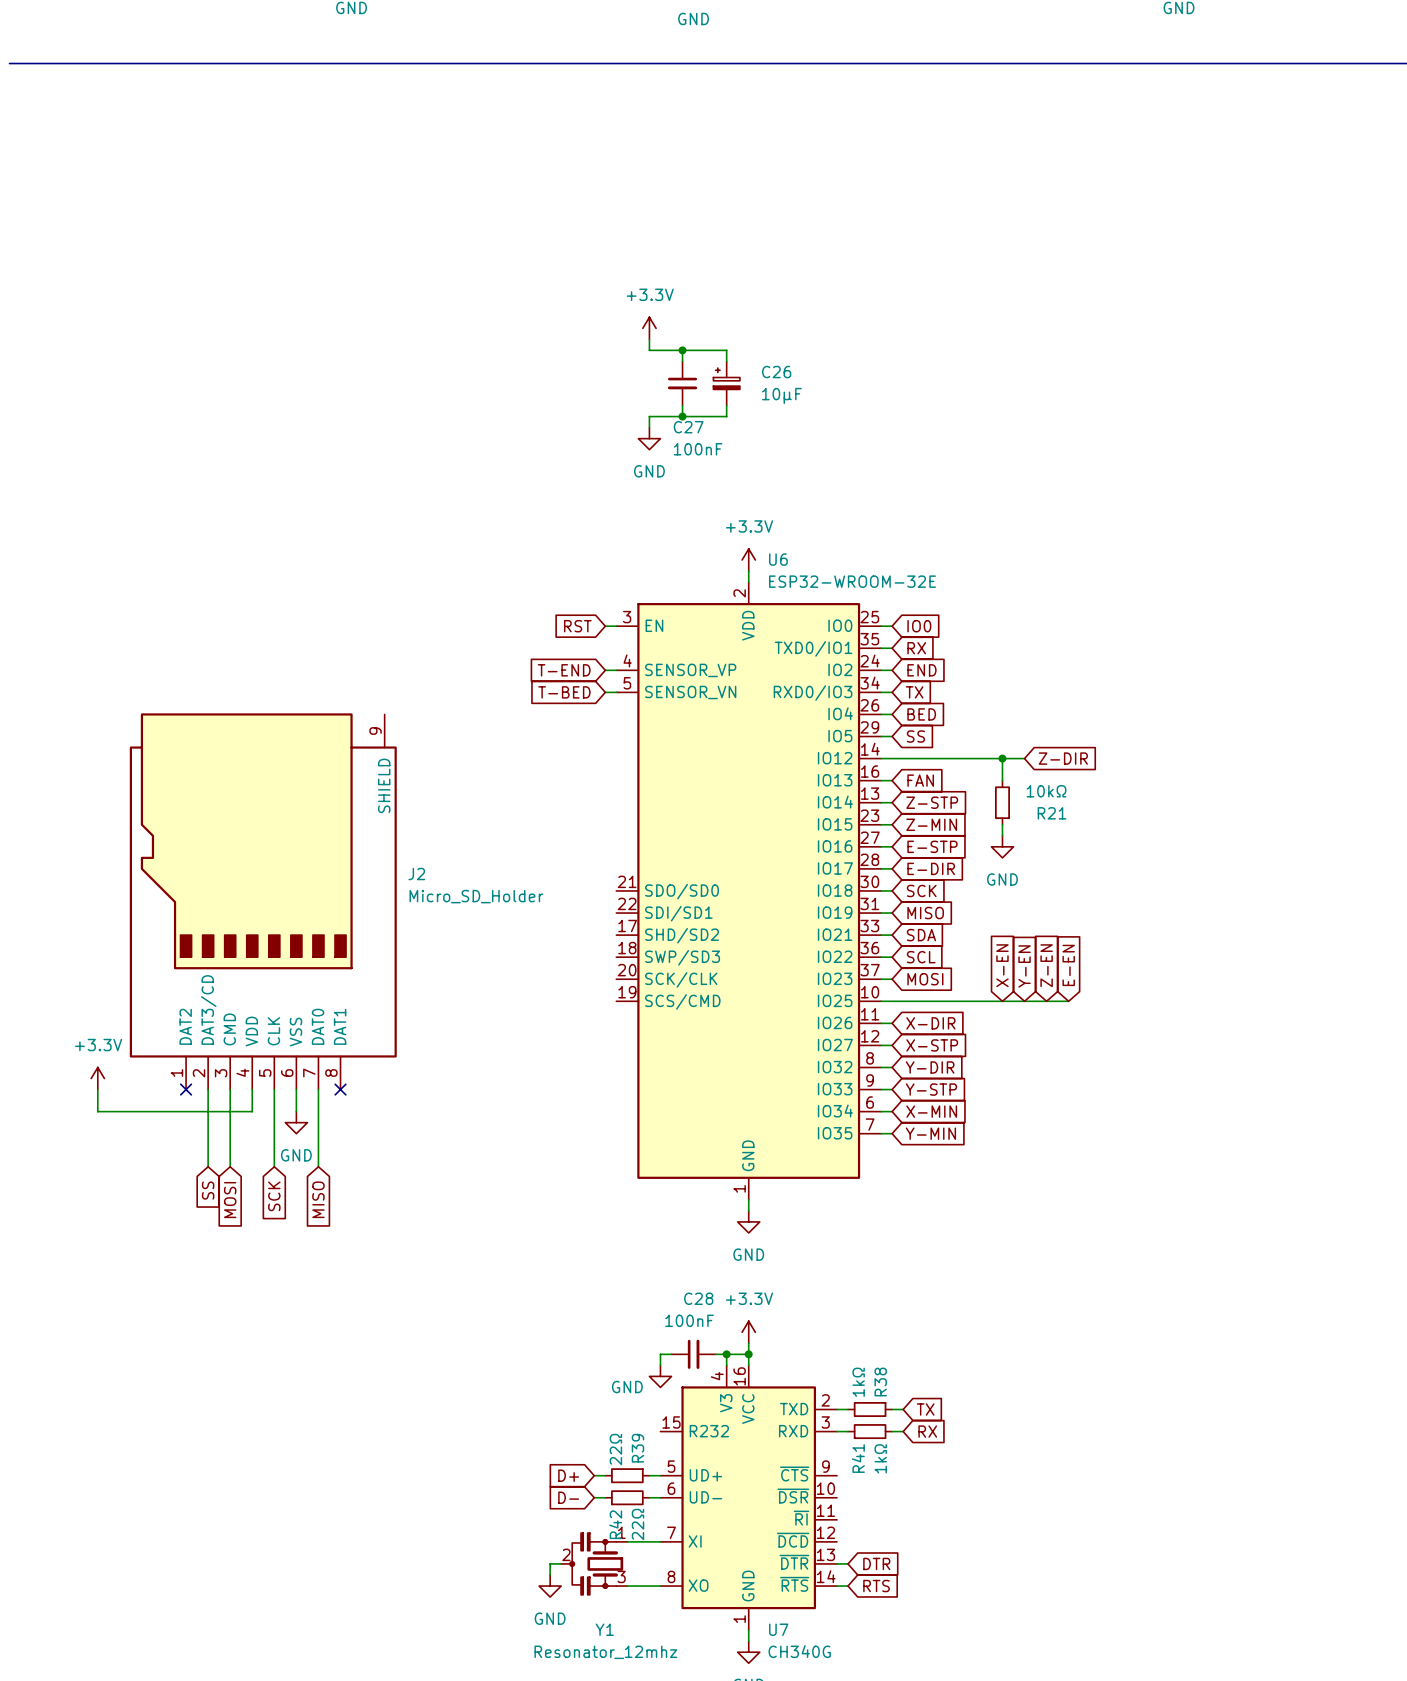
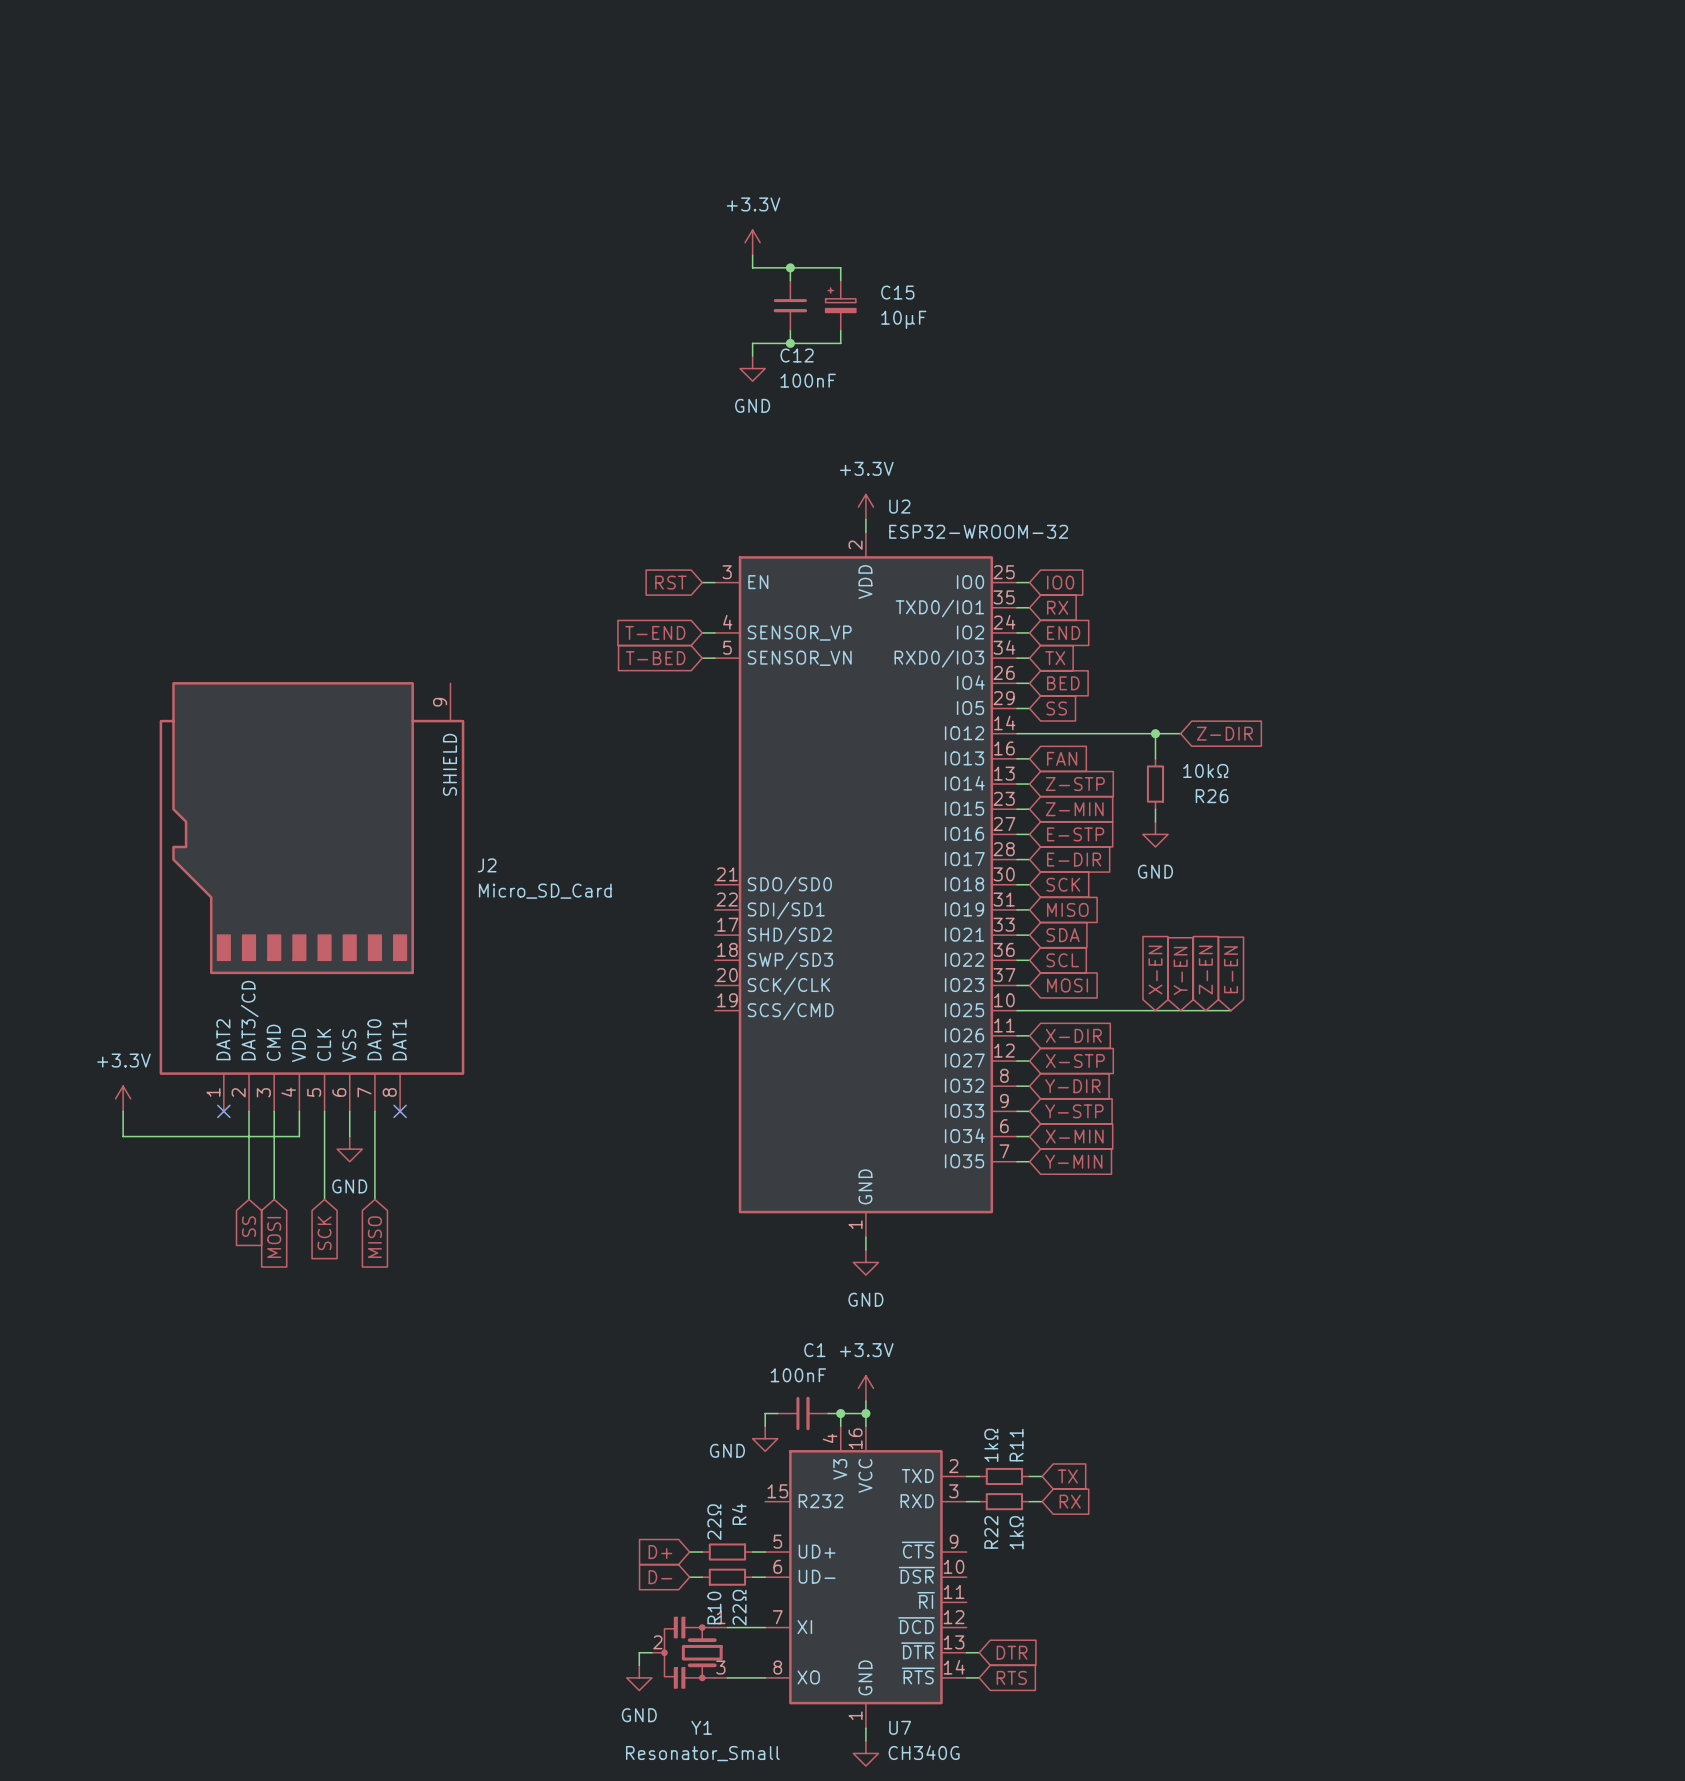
C26 name: C26 (776, 372) -> C15 (897, 292)
C27 name: C27 (688, 427) -> C12 (797, 355)
U6 name: U6 (778, 559) -> U2 (899, 506)
U6 value: ESP32-WROOM-32E (852, 581) -> ESP32-WROOM-32 (978, 531)
R21 name: R21 (1052, 813) -> R26 (1212, 796)
J2 value: Micro_SD_Holder (476, 896) -> Micro_SD_Card (545, 891)
C28 name: C28 (698, 1298) -> C1 (814, 1350)
R38 name: R38 (880, 1382) -> R11 (1016, 1445)
R39 name: R39 (637, 1448) -> R4 (739, 1514)
R41 name: R41 (858, 1458) -> R22 (991, 1532)
R42 name: R42 (615, 1524) -> R10 (714, 1607)
Y1 value: Resonator_12mhz (605, 1652) -> Resonator_Small (702, 1753)

